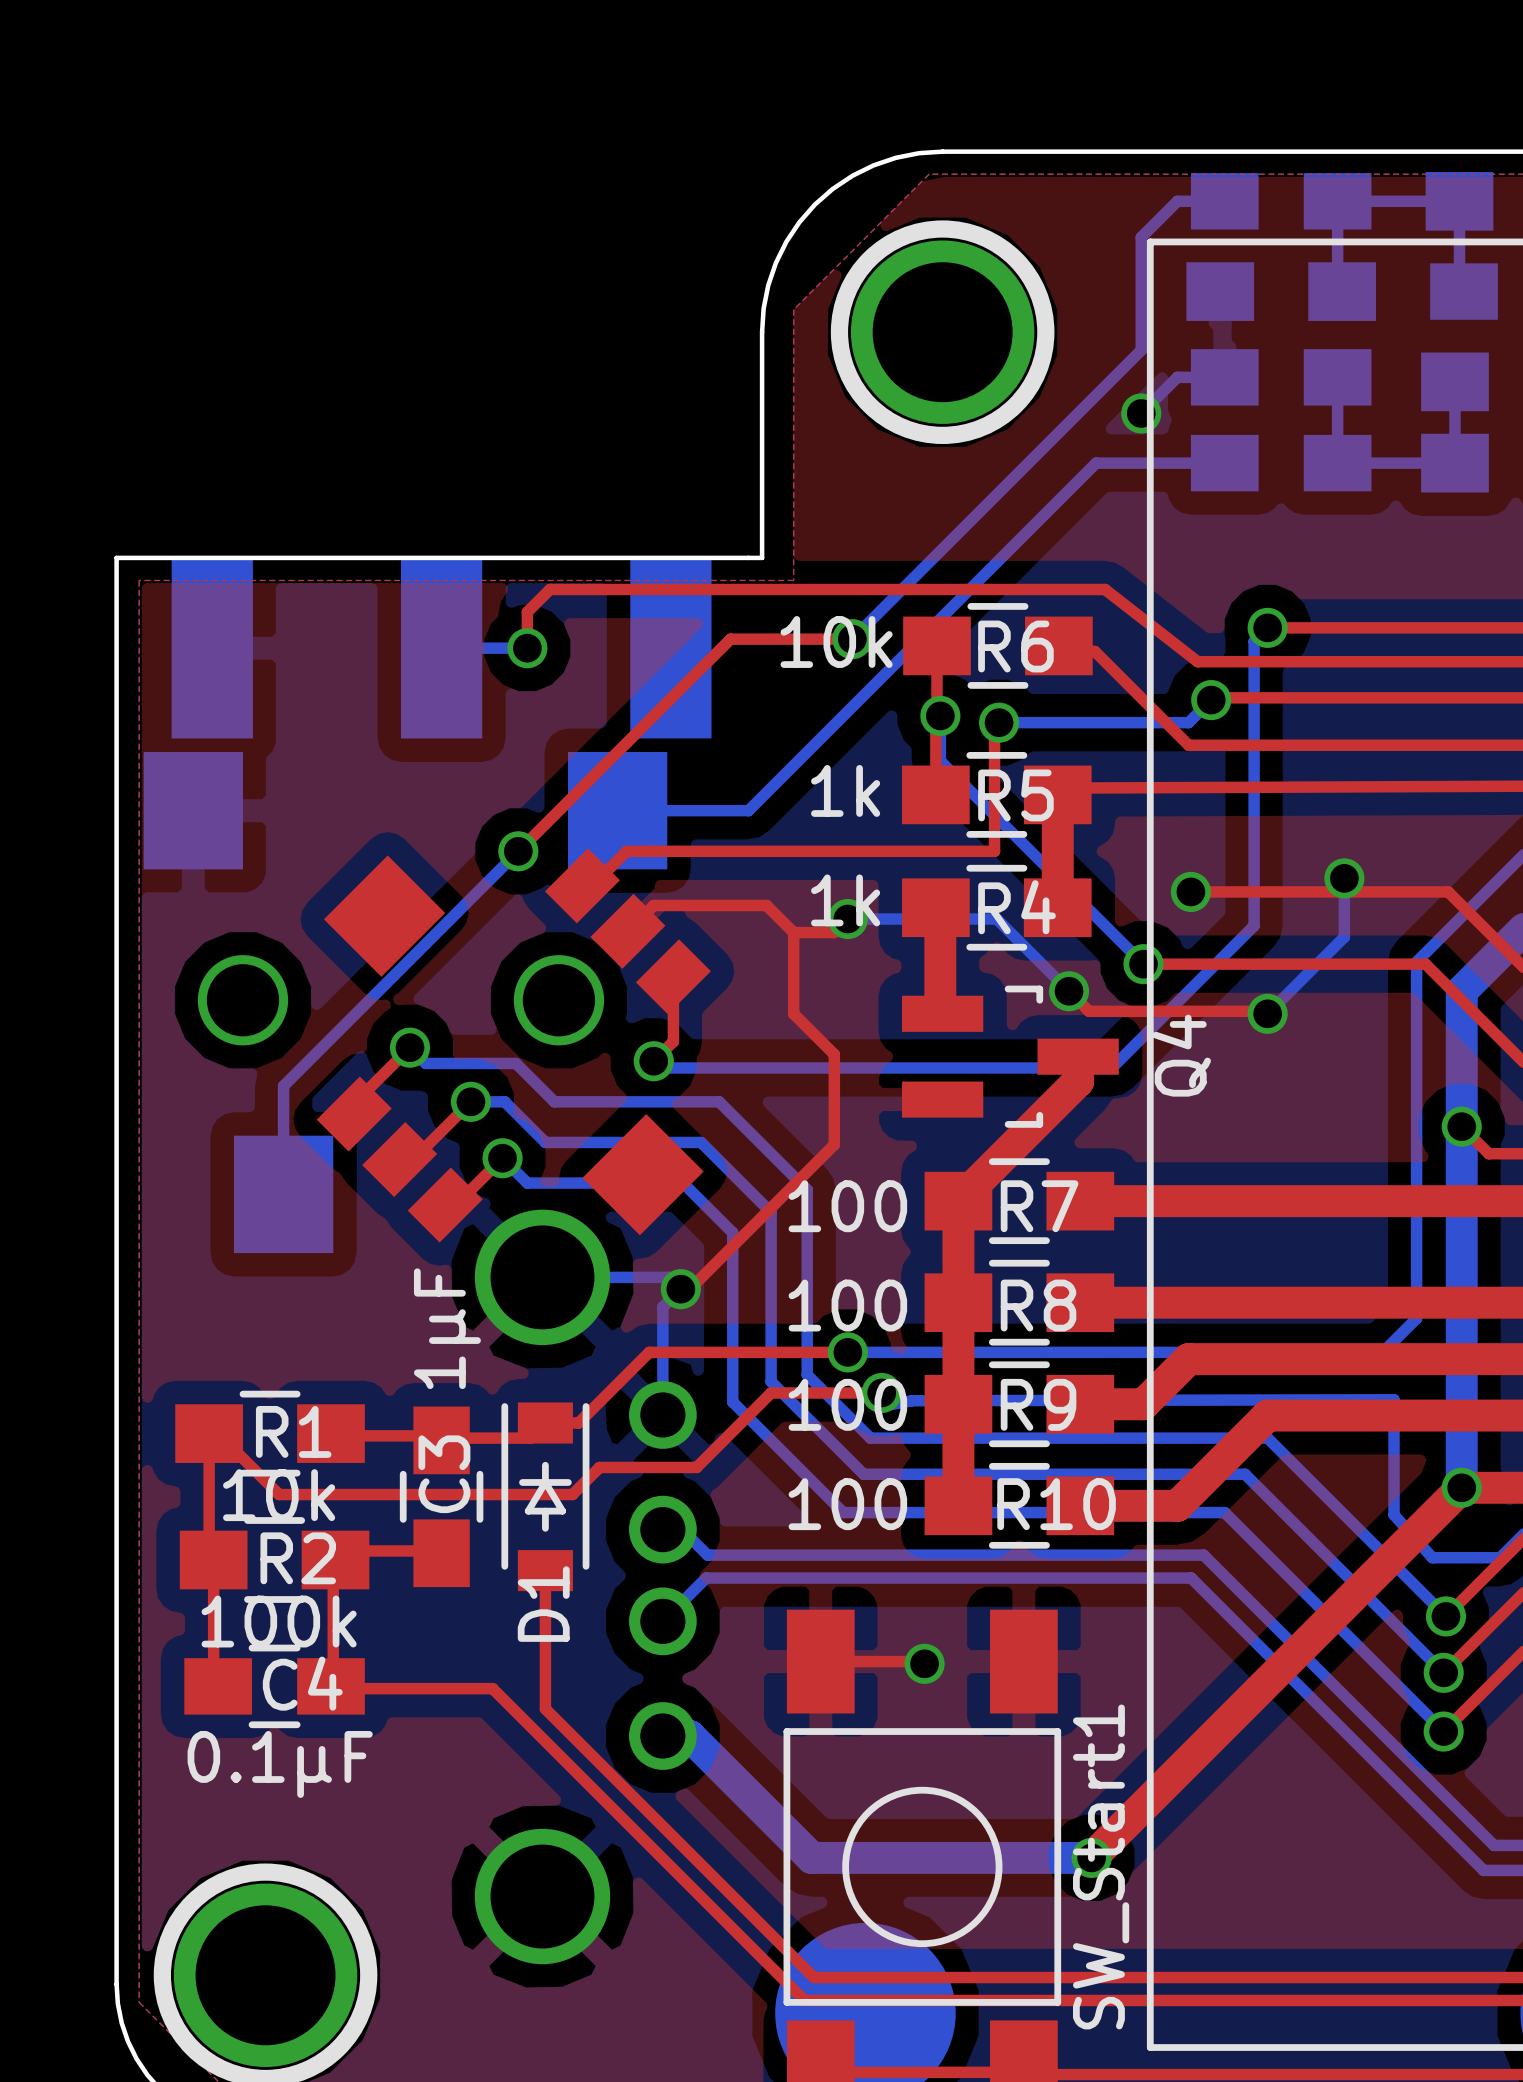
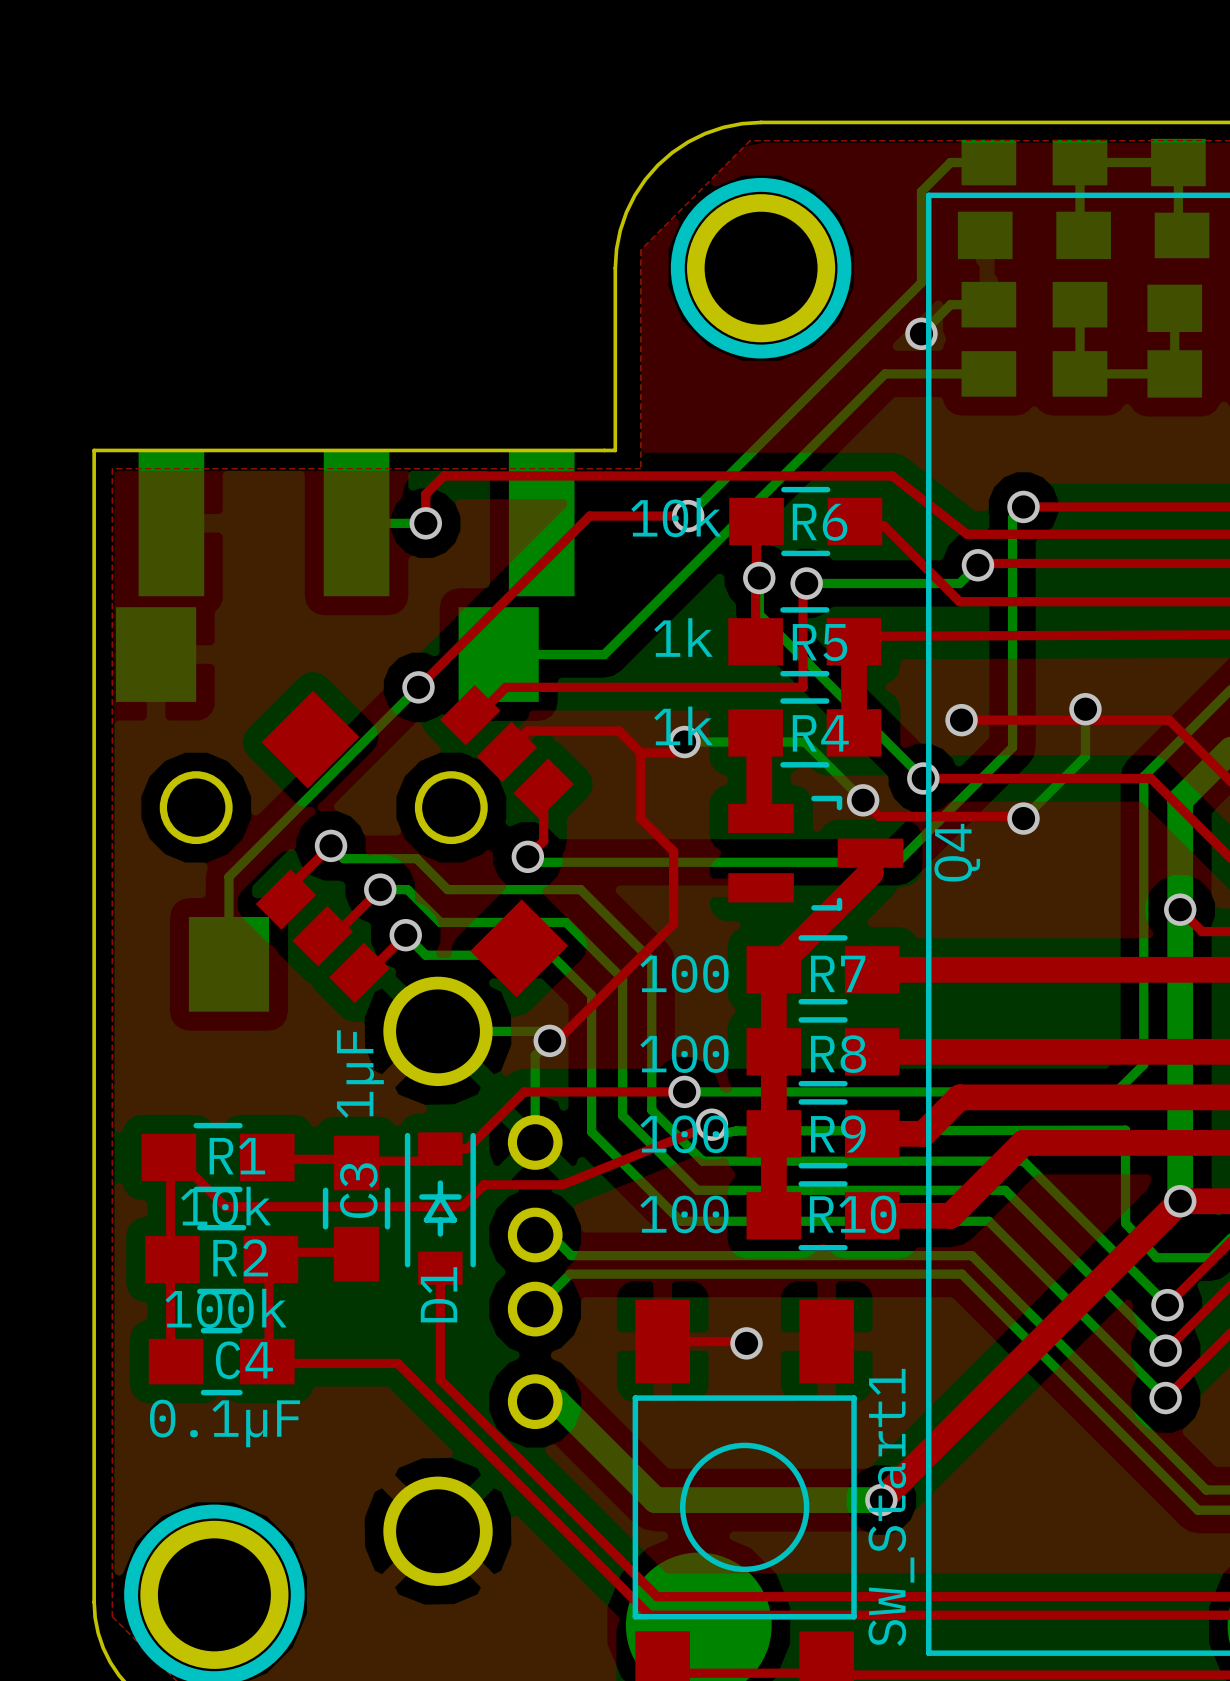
top track: (881, 1392) (771, 1392) (696, 1467) -> (711, 1124) (562, 1184)
top track: (209, 1433) (209, 1555) (213, 1560) (213, 1681) (218, 1686) -> none
top track: none -> (170, 1159) (170, 1363)

